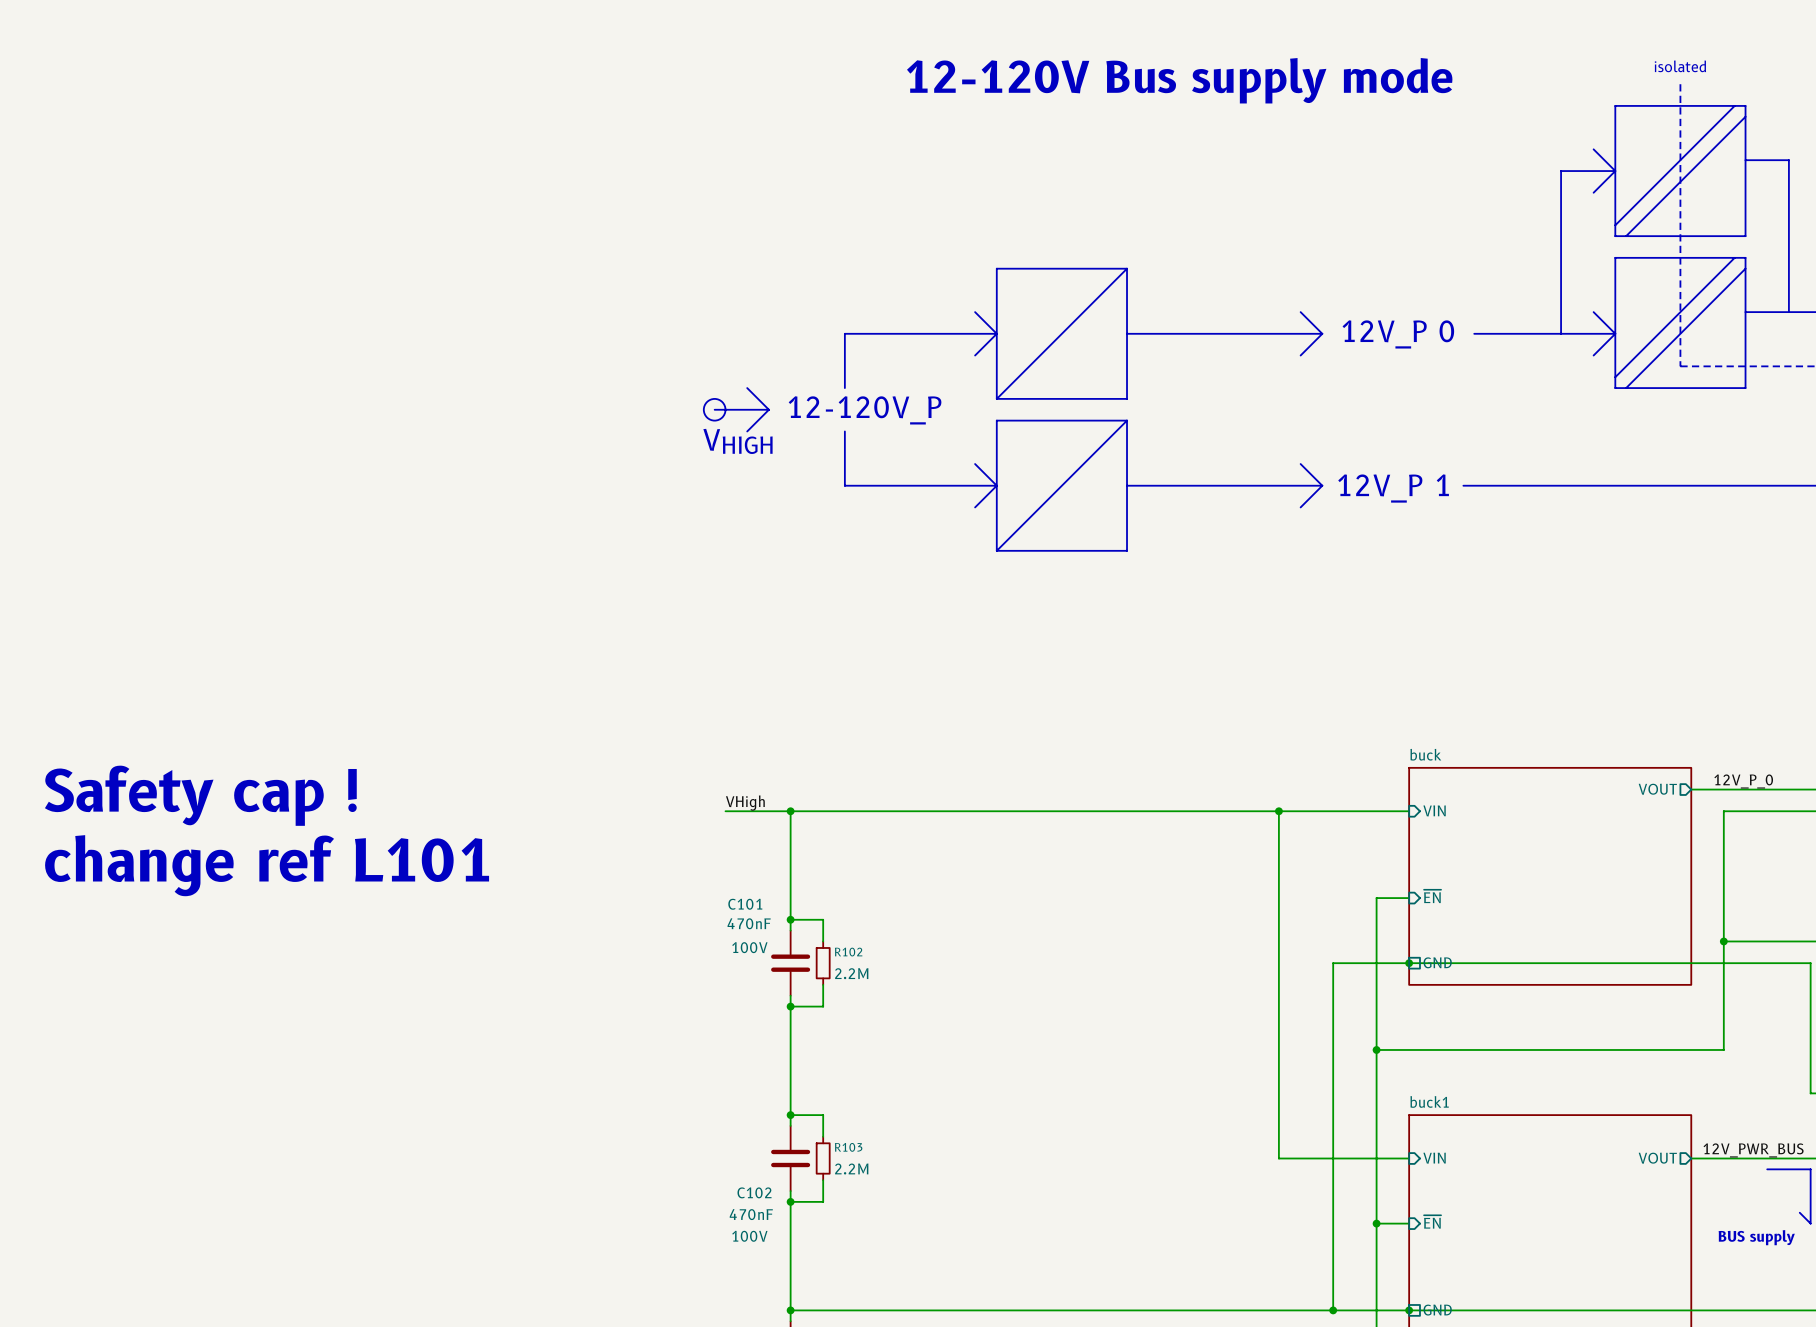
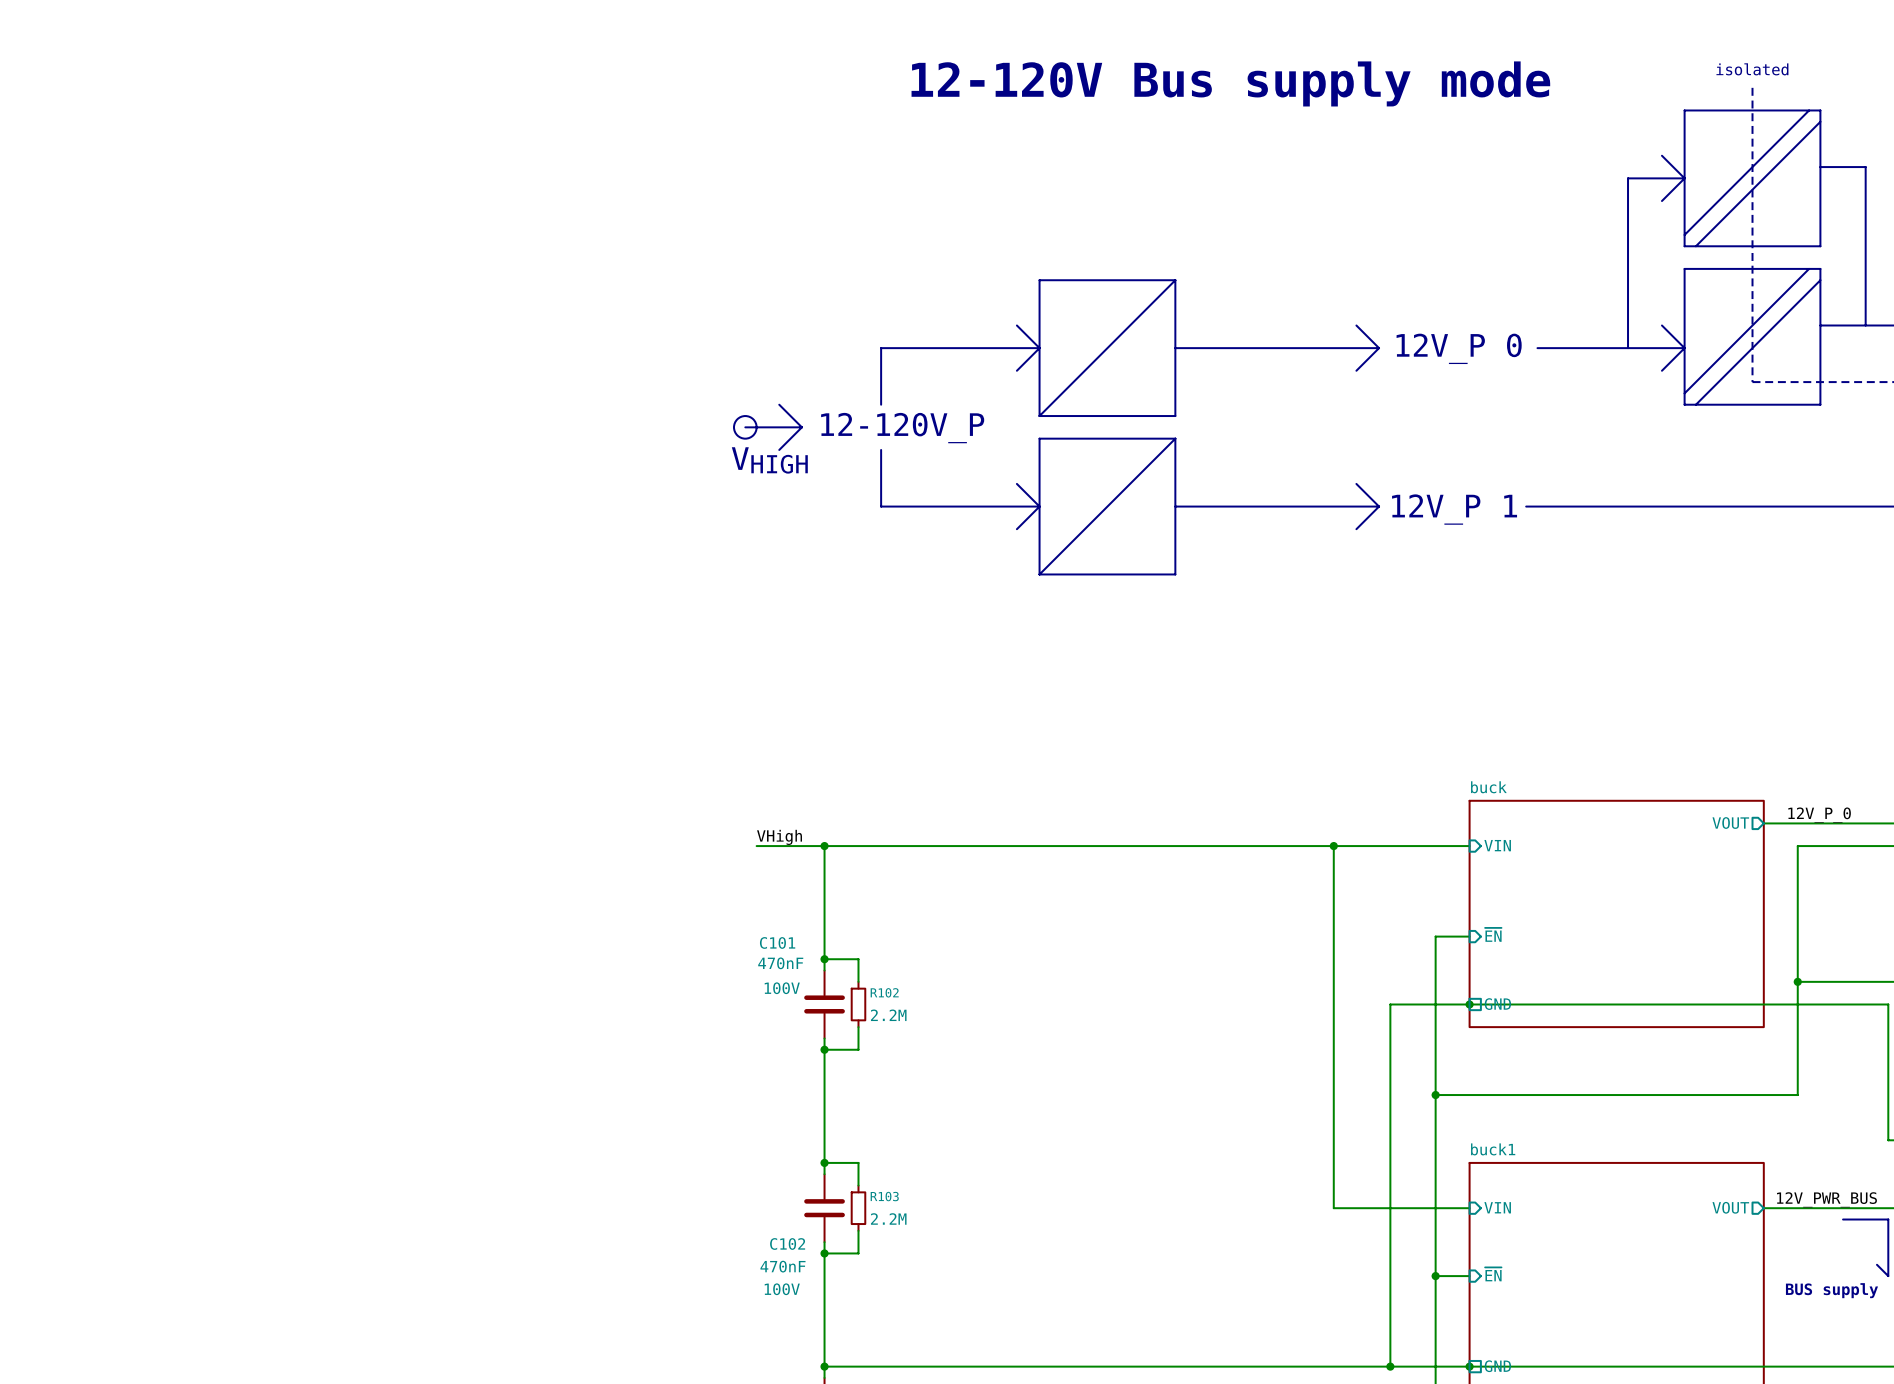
text: Safety cap ! (200, 795) -> none
text: change ref L101 (267, 865) -> none

